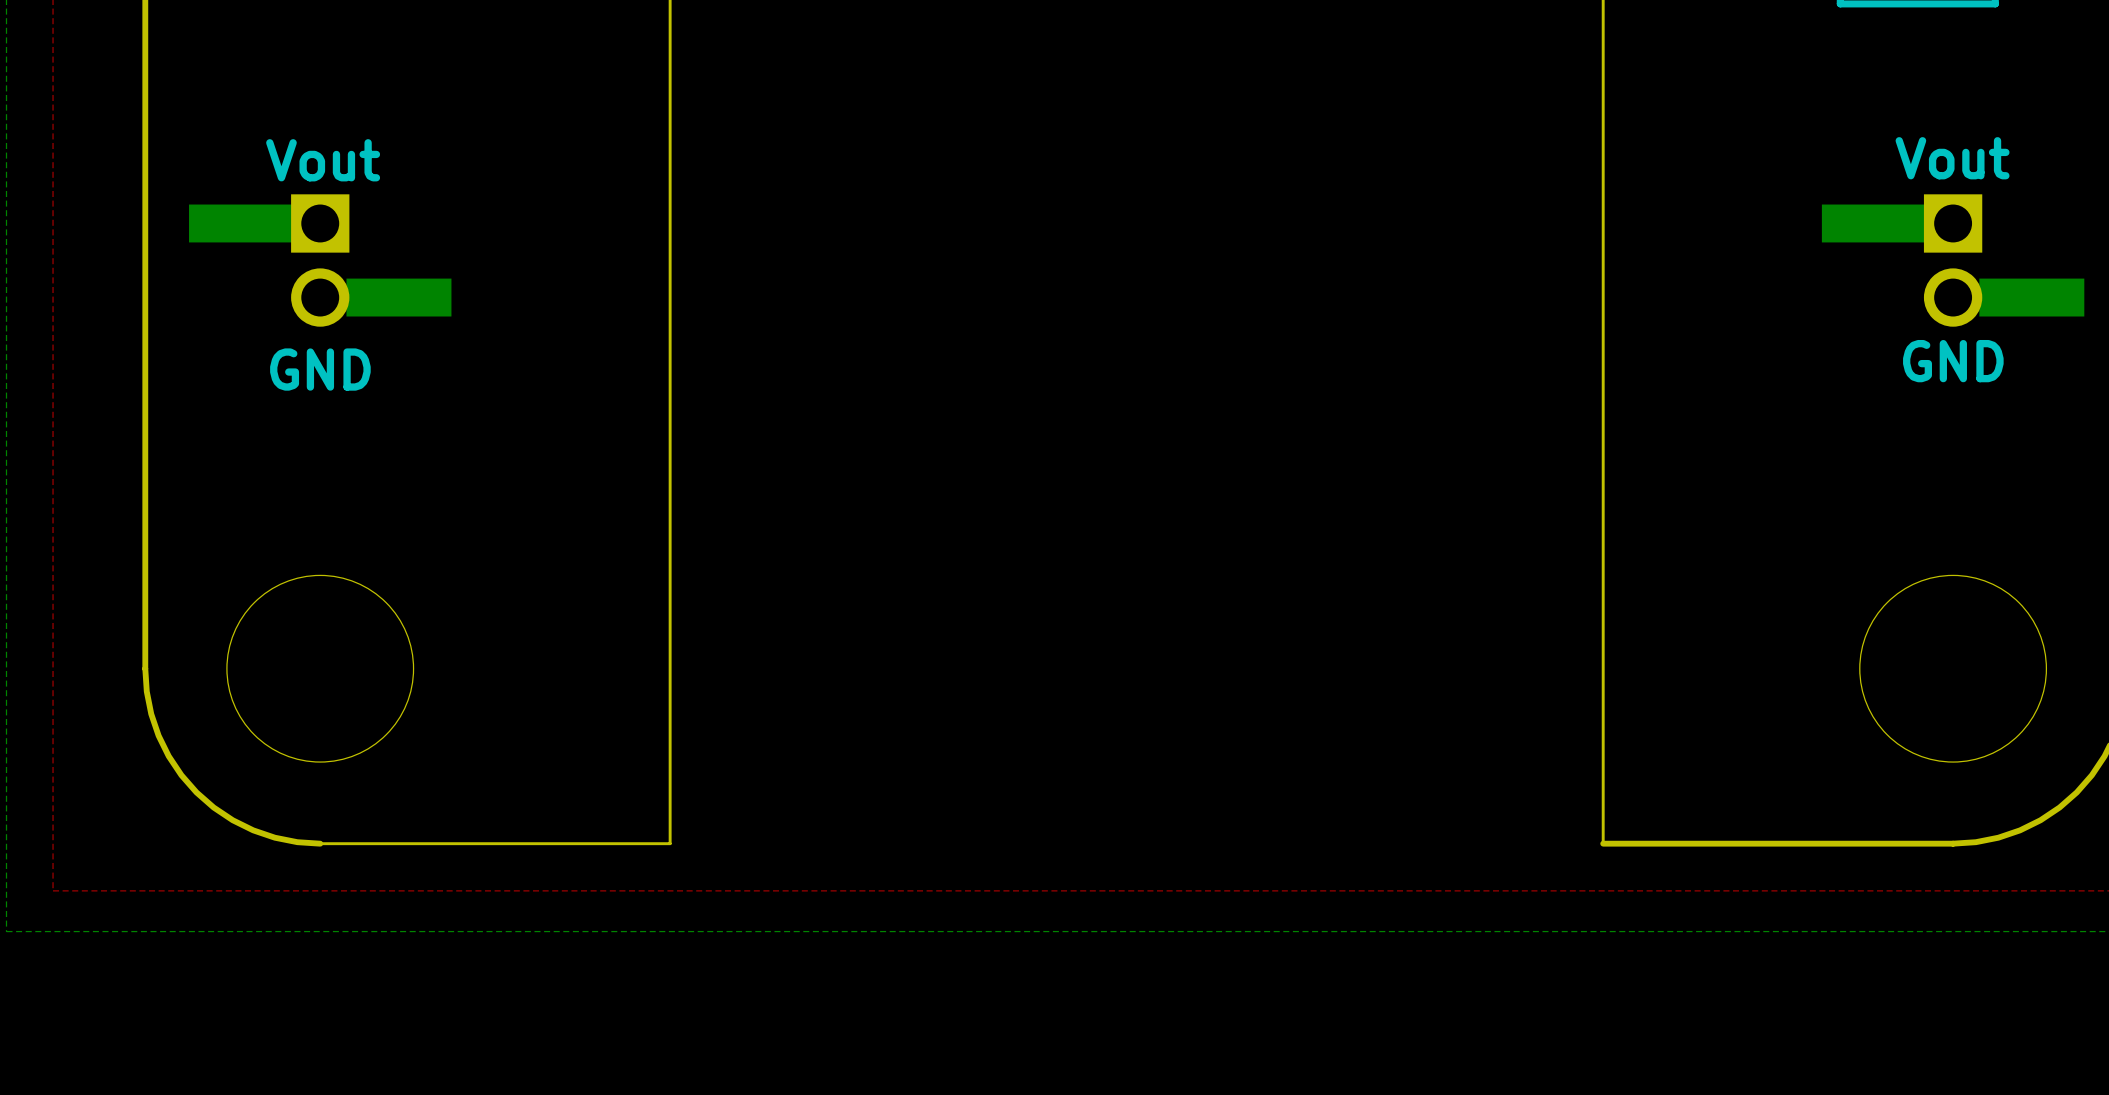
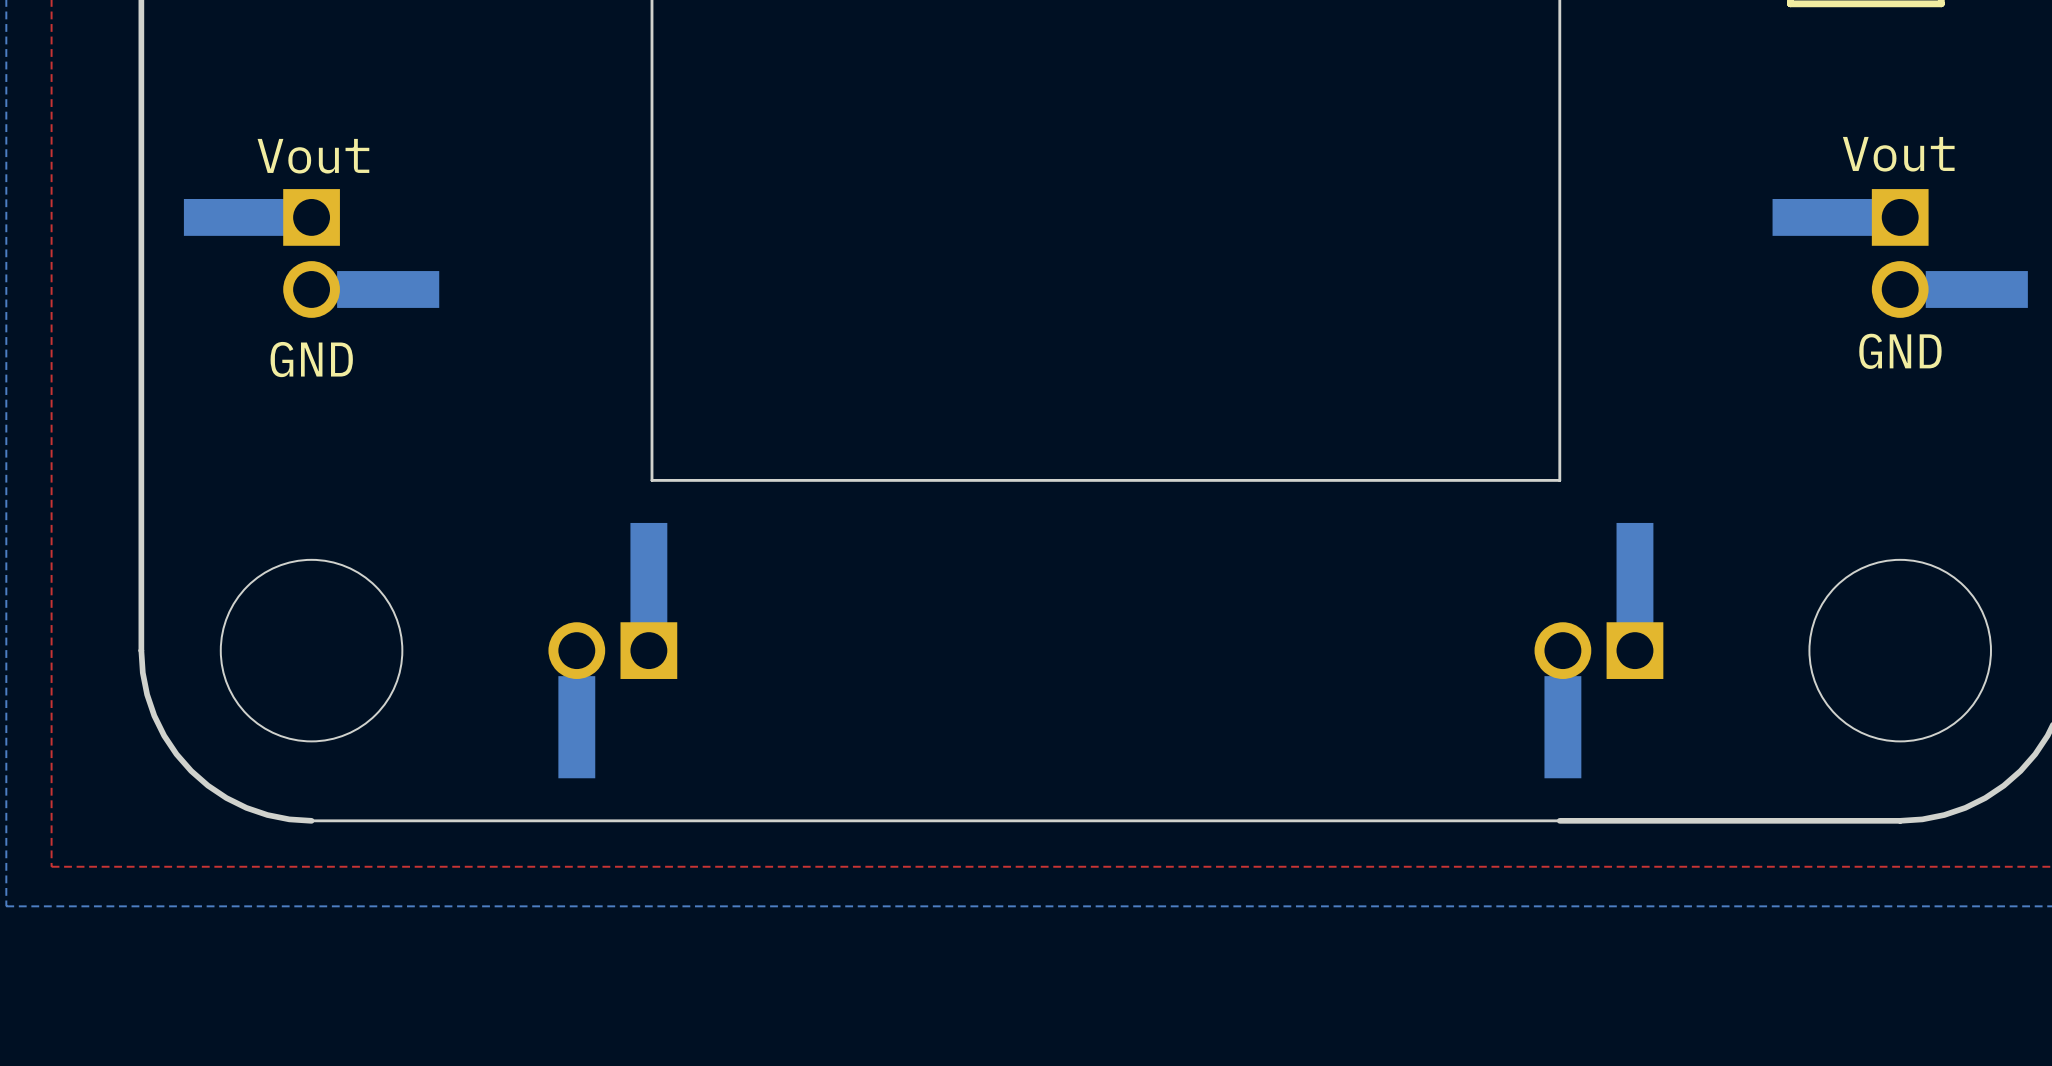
board edge: (670, 493) (670, 843) -> (1559, 820) (651, 820)
board edge: (1603, 493) (1603, 843) -> (1559, 480) (651, 480)
part: none -> (612, 650)
part: none -> (1598, 650)

